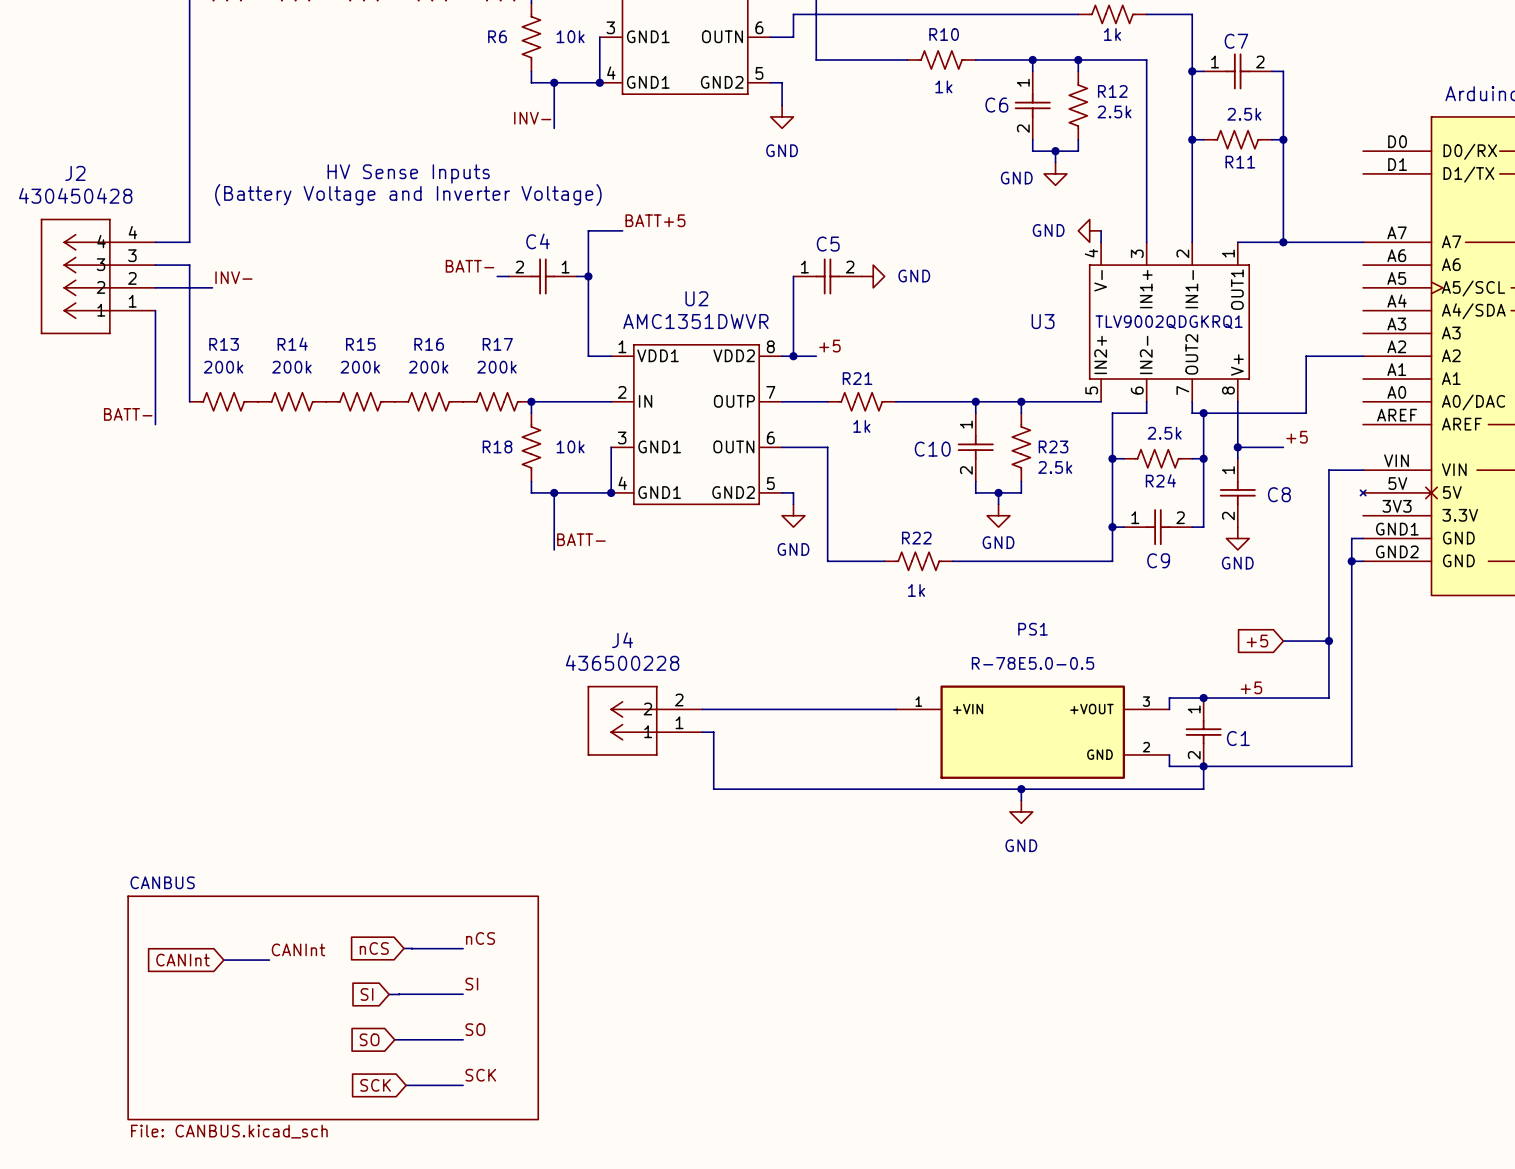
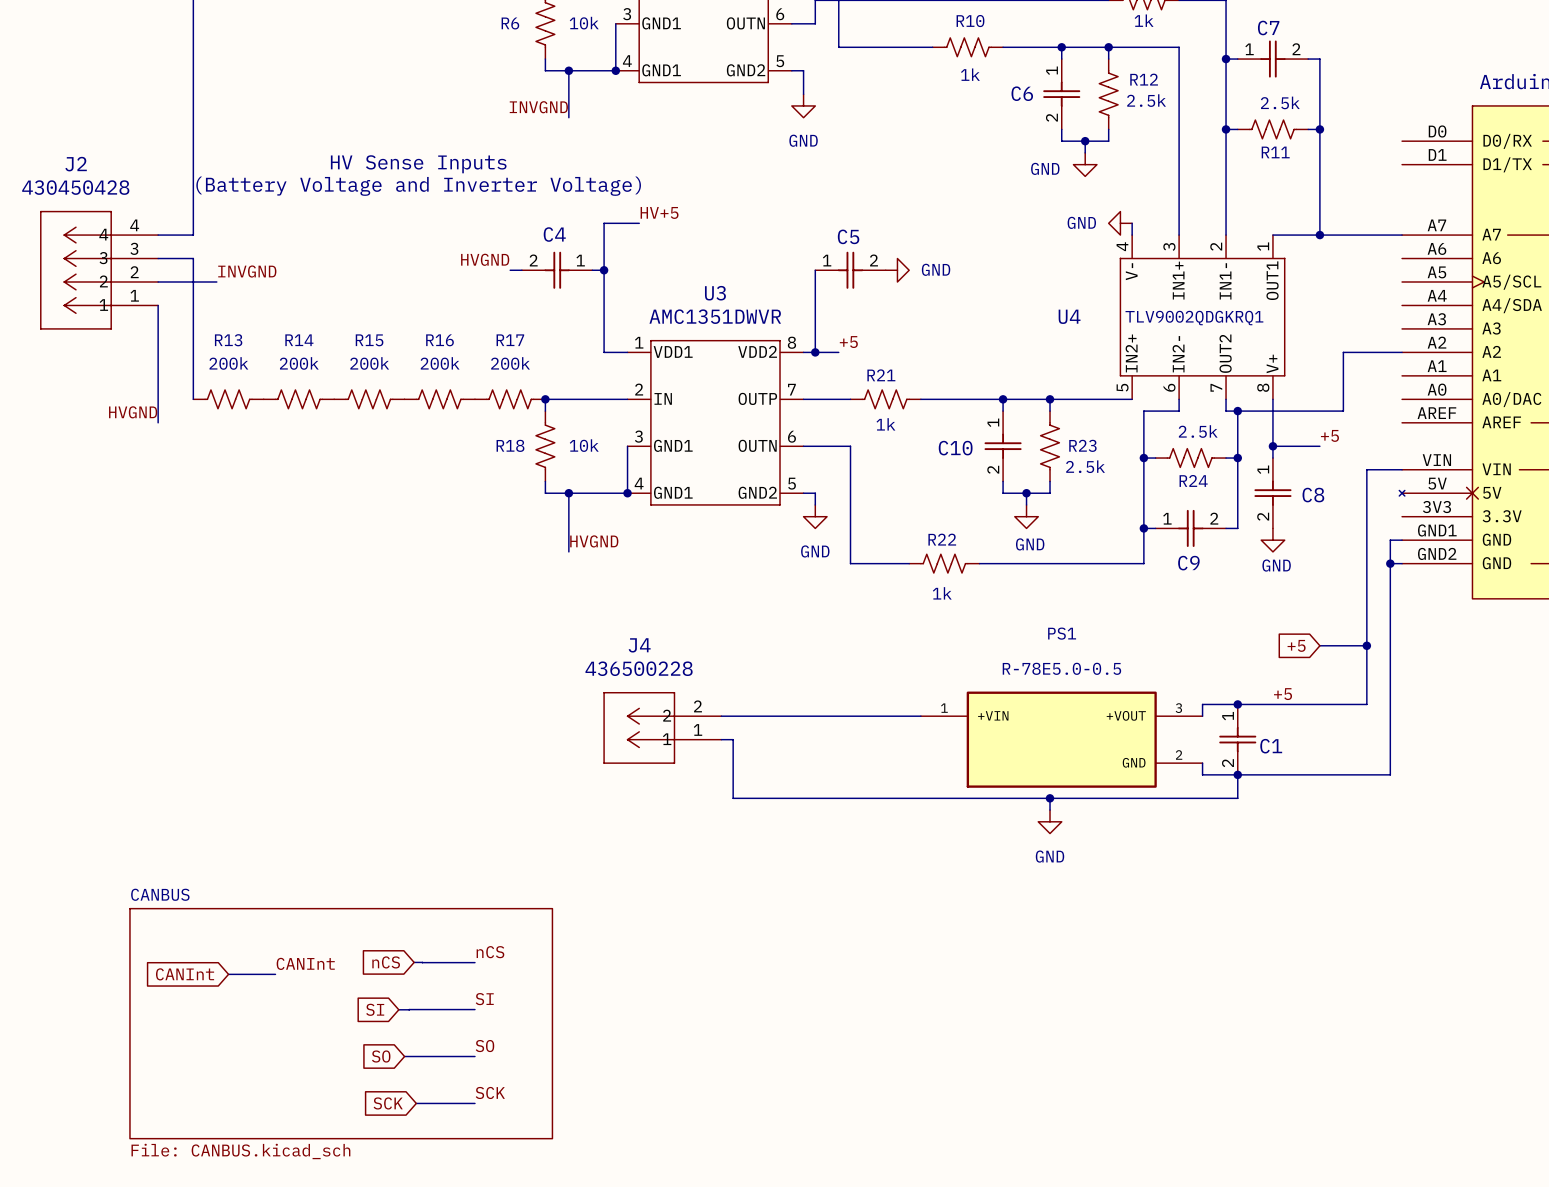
label: INV- (532, 118) -> INVGND (538, 107)
label: BATT+5 (655, 220) -> HV+5 (659, 212)
label: BATT- (470, 266) -> HVGND (485, 259)
label: INV- (233, 277) -> INVGND (247, 271)
U2 name: U2 (696, 298) -> U3 (715, 293)
U3 name: U3 (1043, 321) -> U4 (1069, 316)
label: BATT- (128, 414) -> HVGND (133, 412)
label: BATT- (581, 539) -> HVGND (594, 541)

